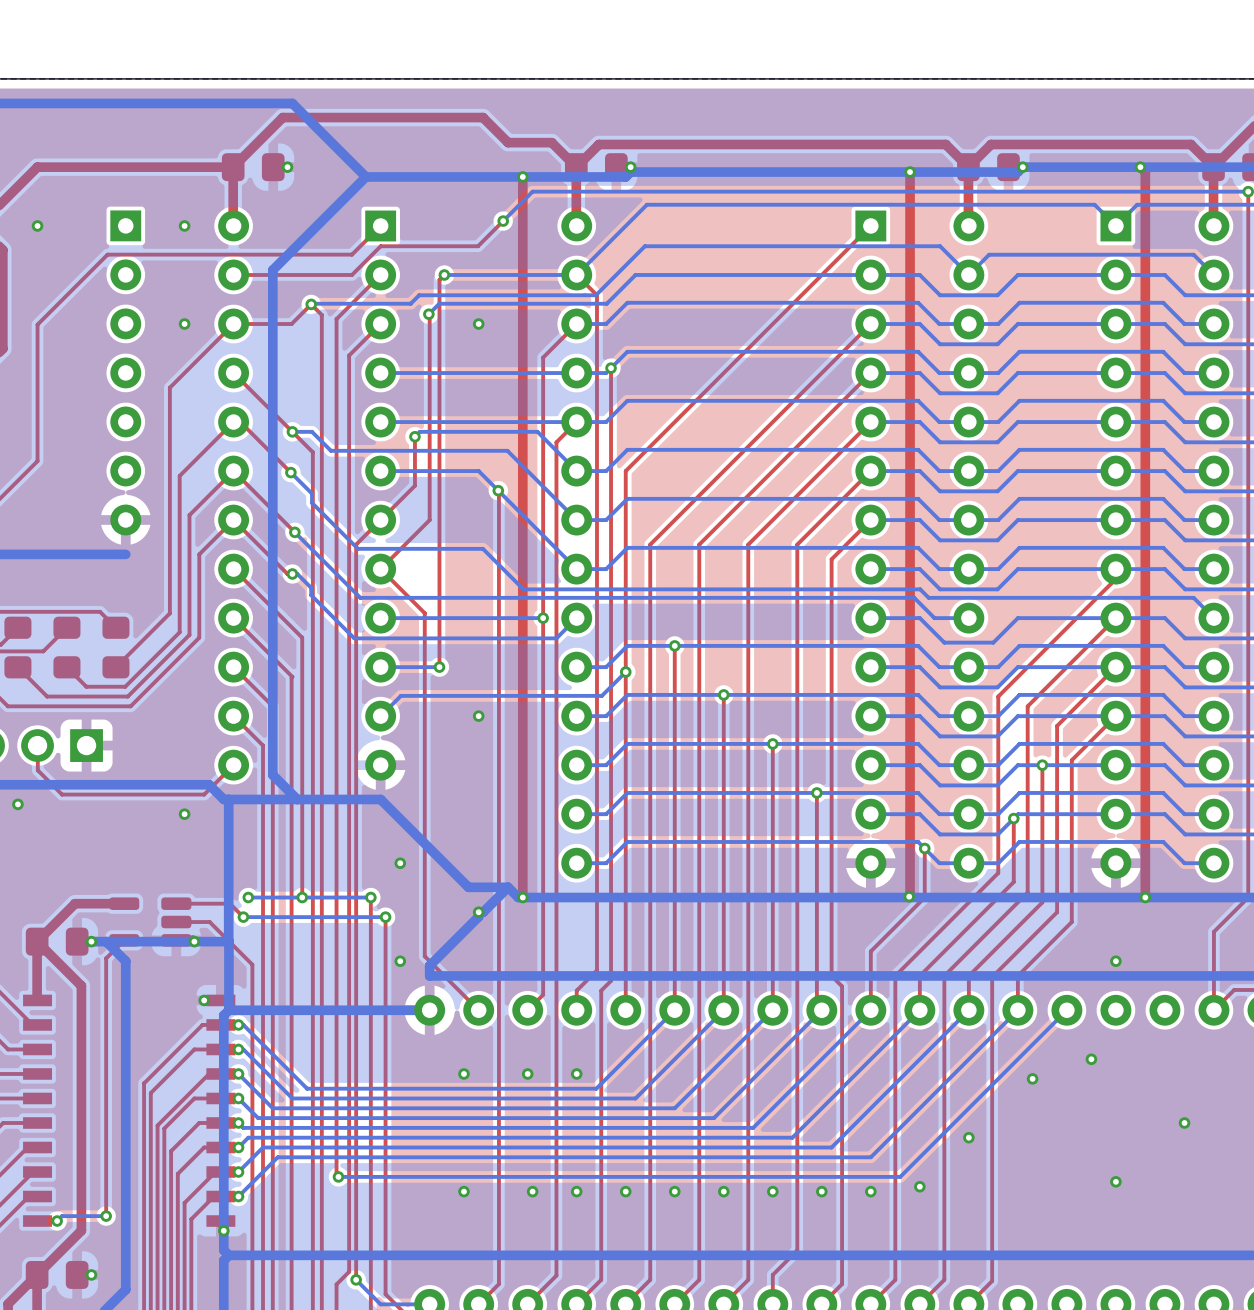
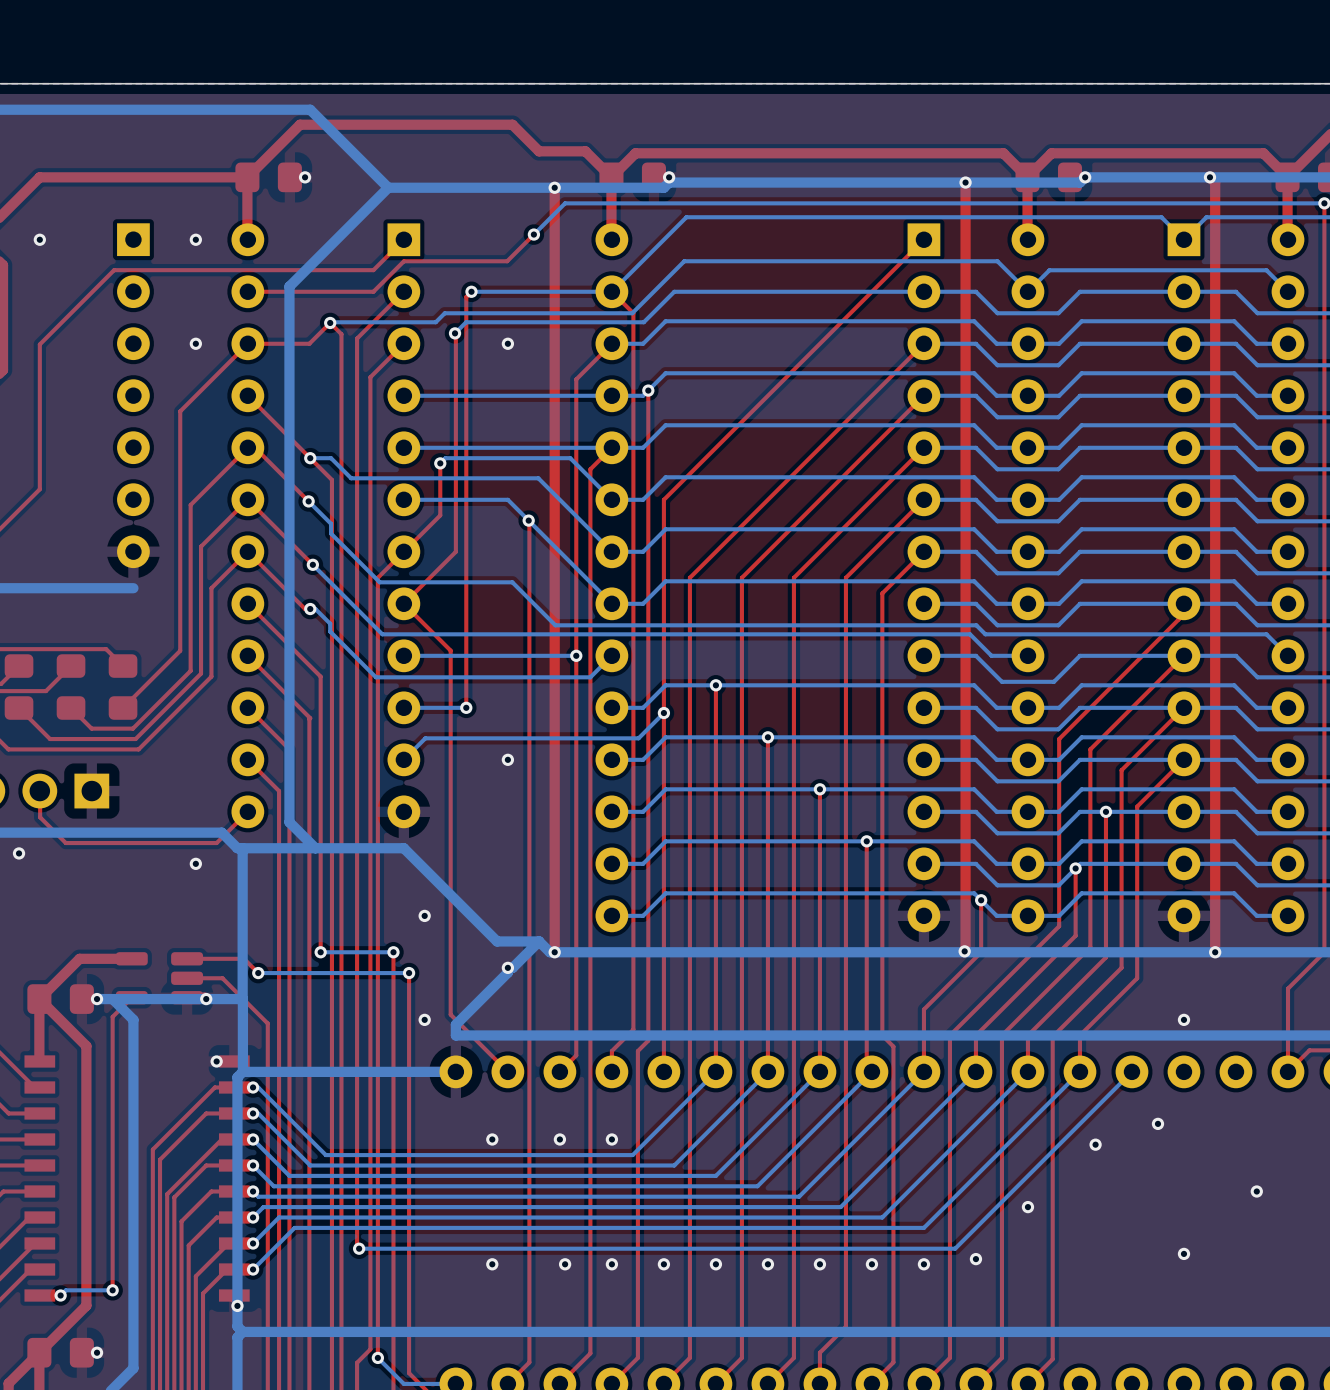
via: (248, 897) -> none
bottom track: (302, 897) (248, 897) -> none

